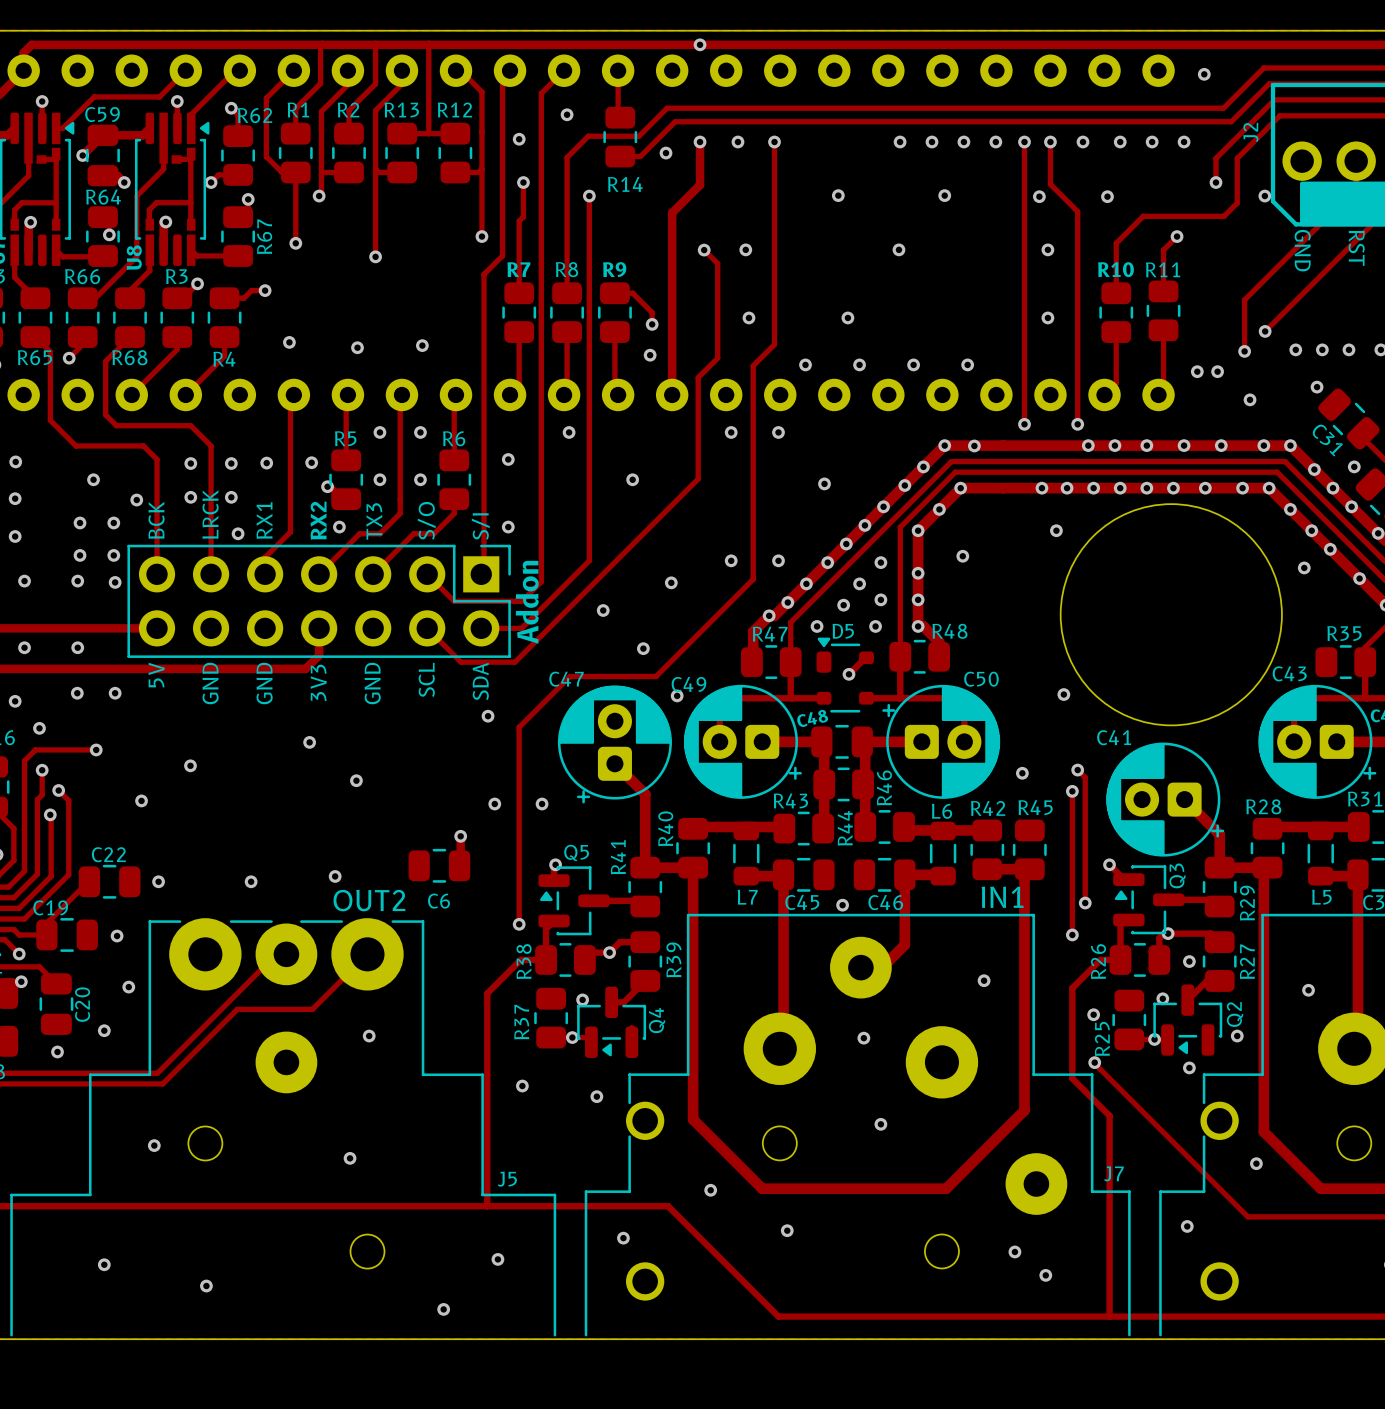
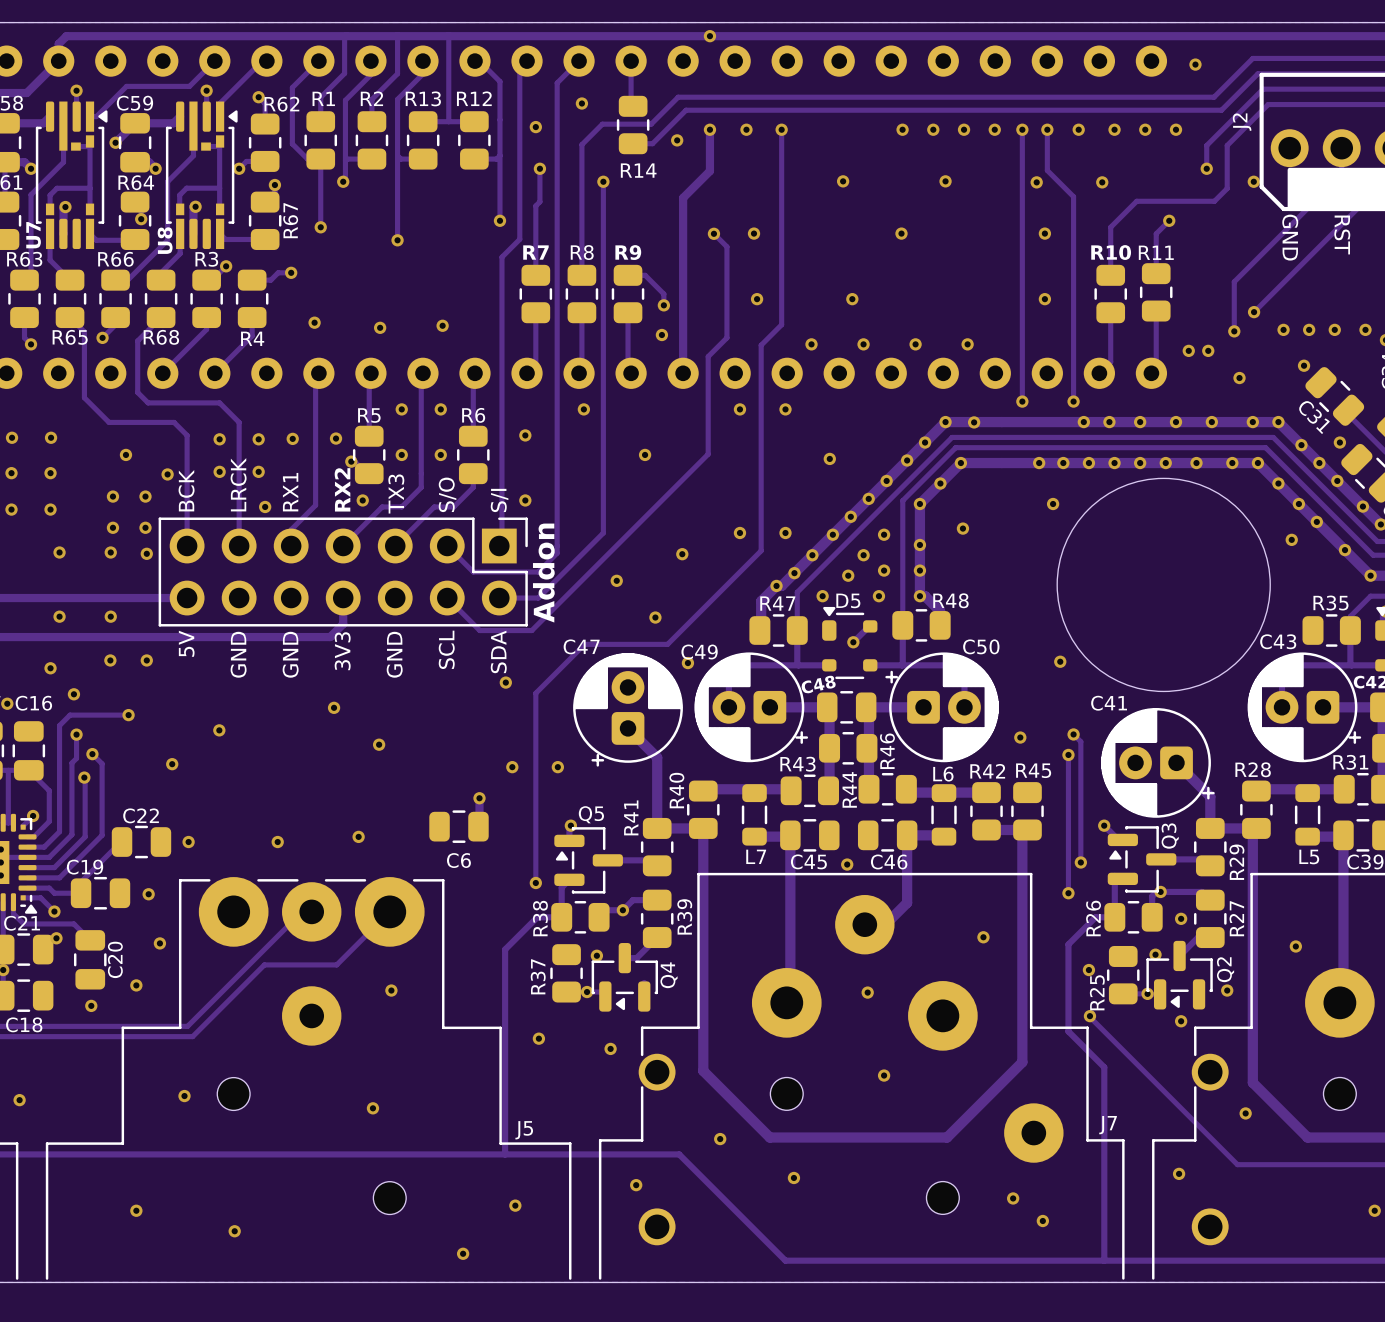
text: IN1 (1002, 897) -> none
text: OUT2 (369, 900) -> none

